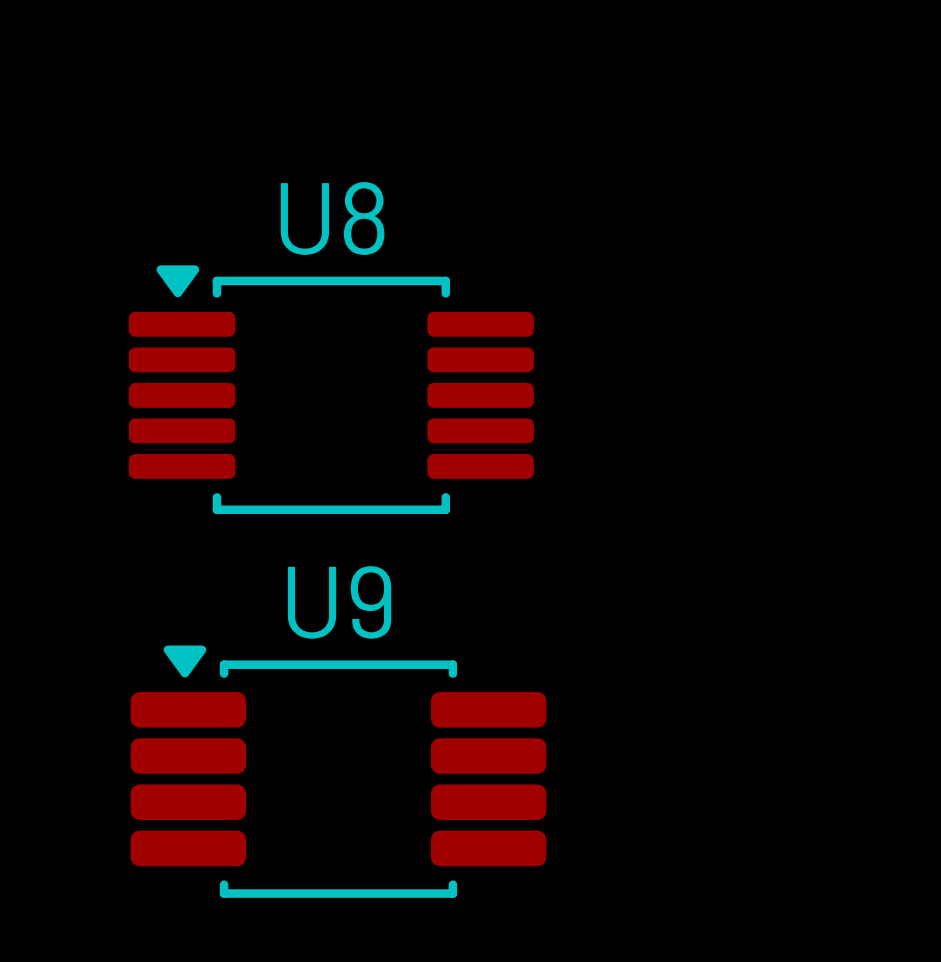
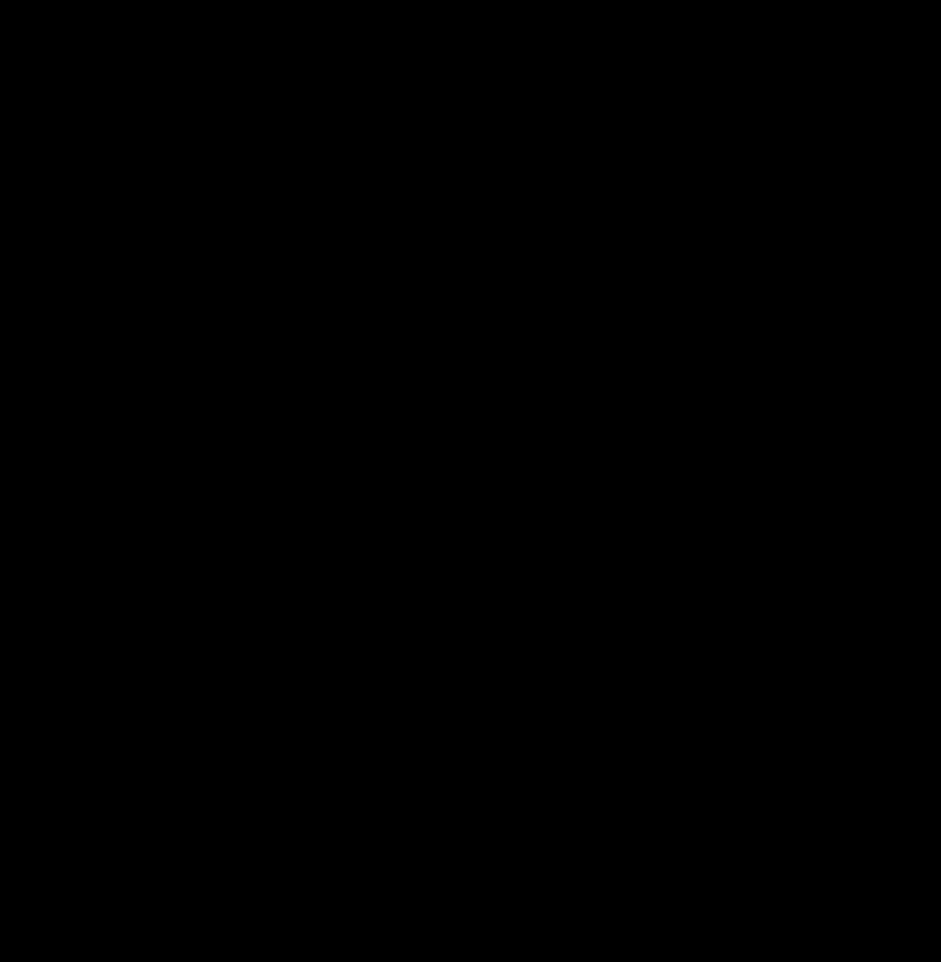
U8: (331, 389) -> none
U9: (338, 771) -> none

